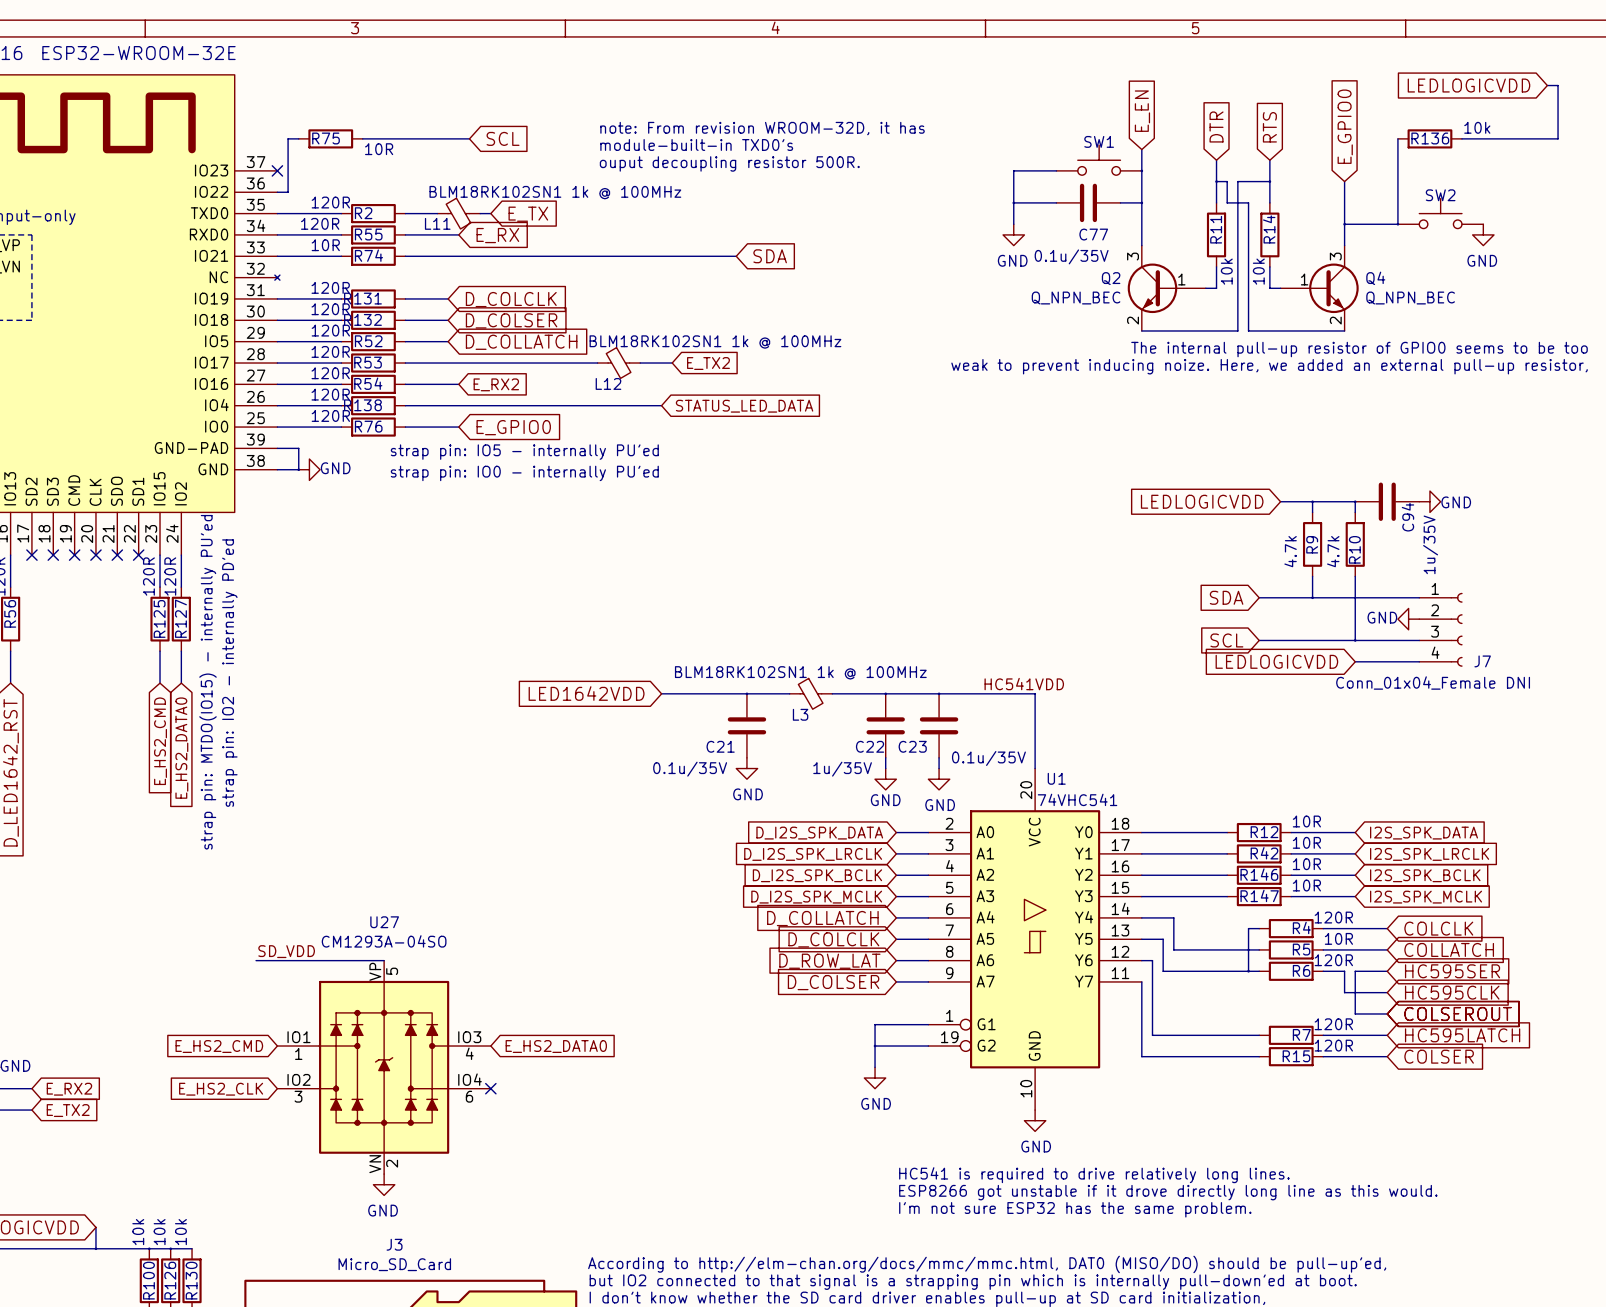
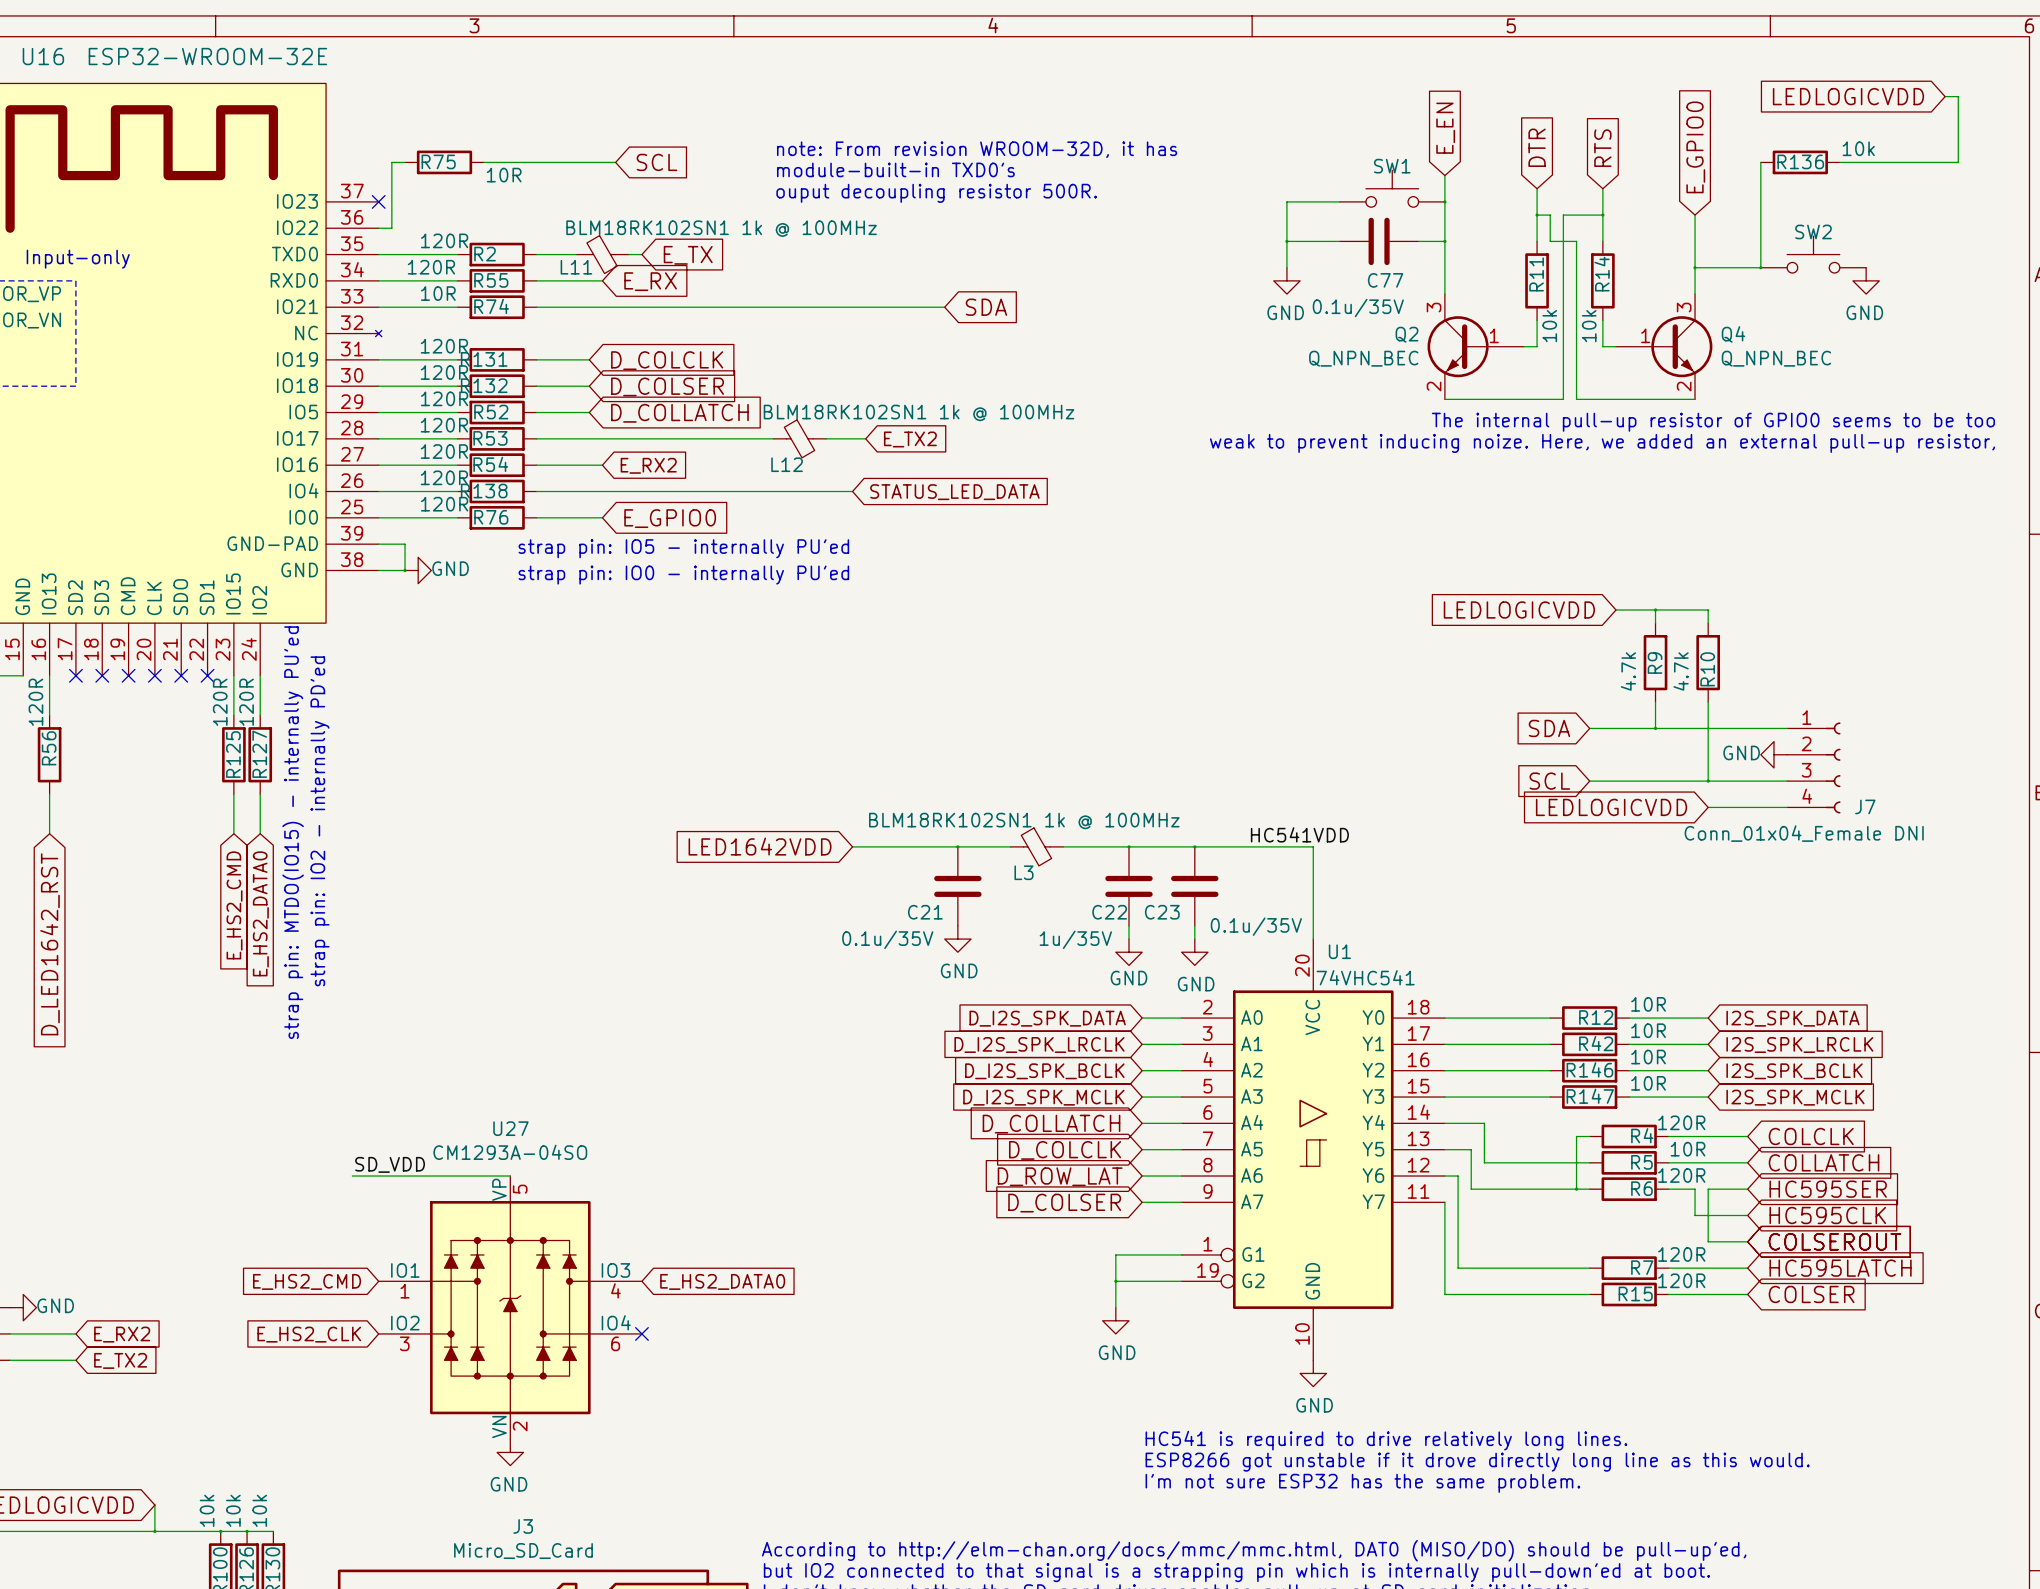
C94: 1u/35V (1387, 501) -> none
power symbol: GND (1429, 501) -> none

